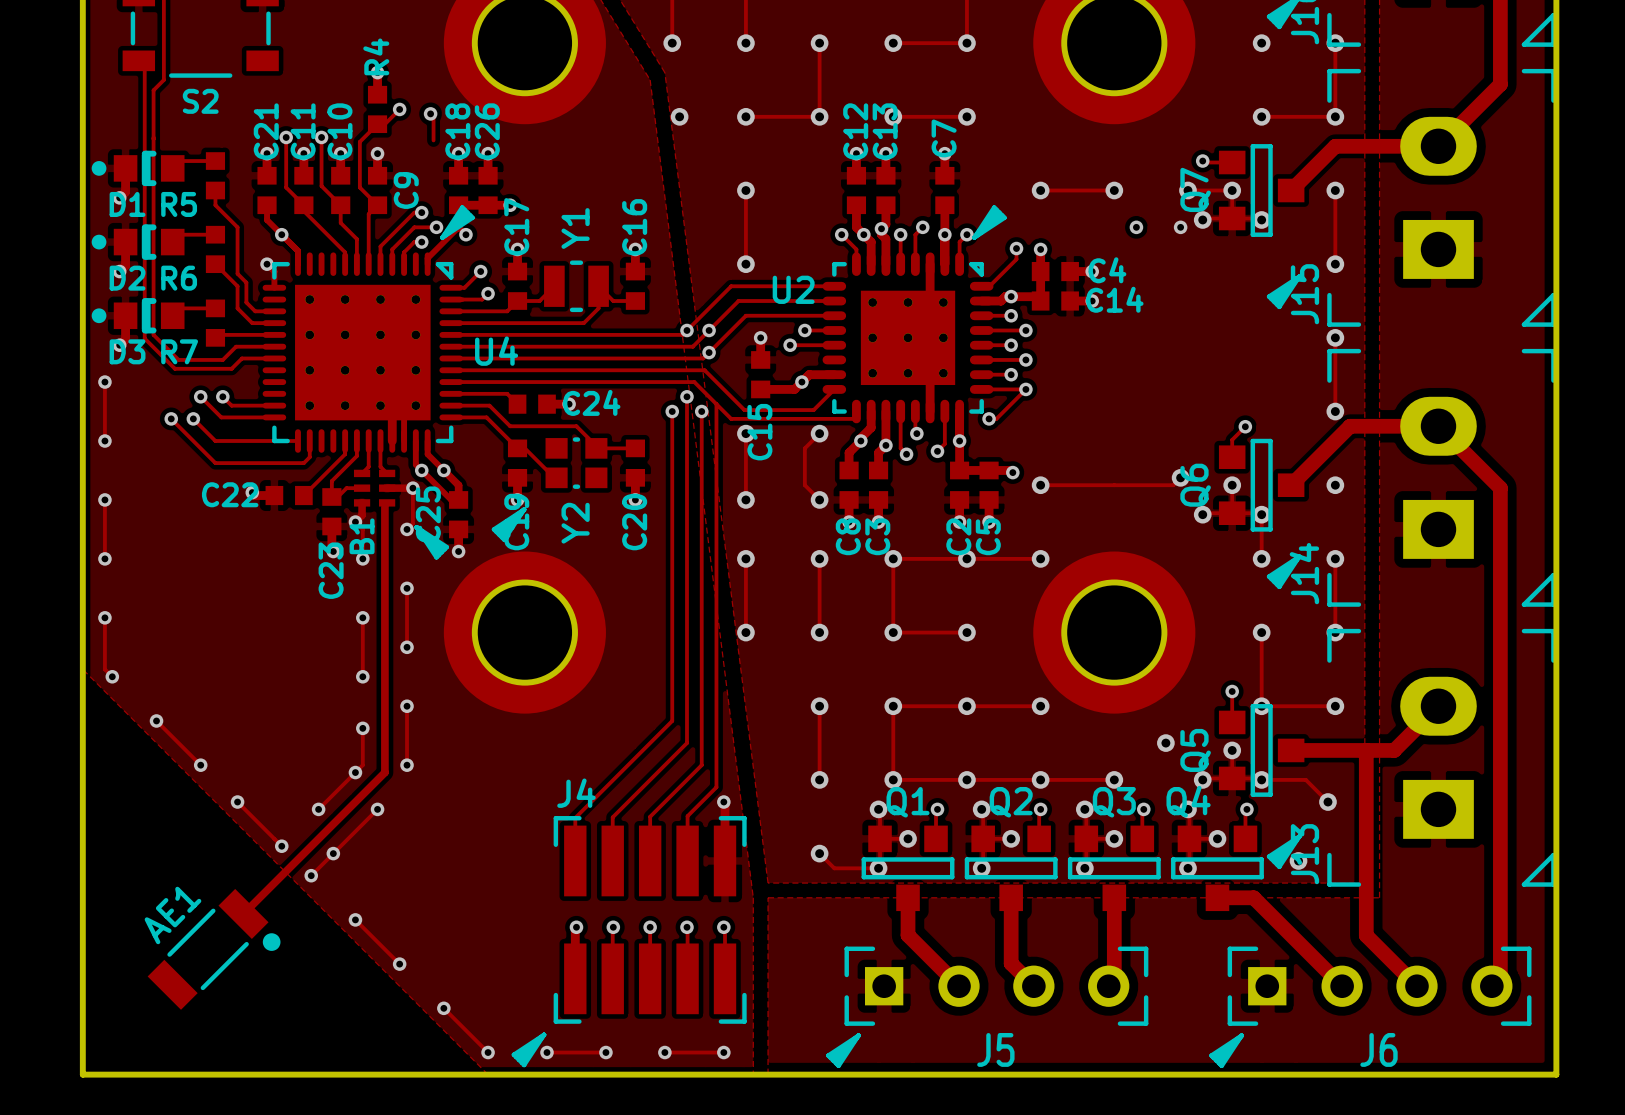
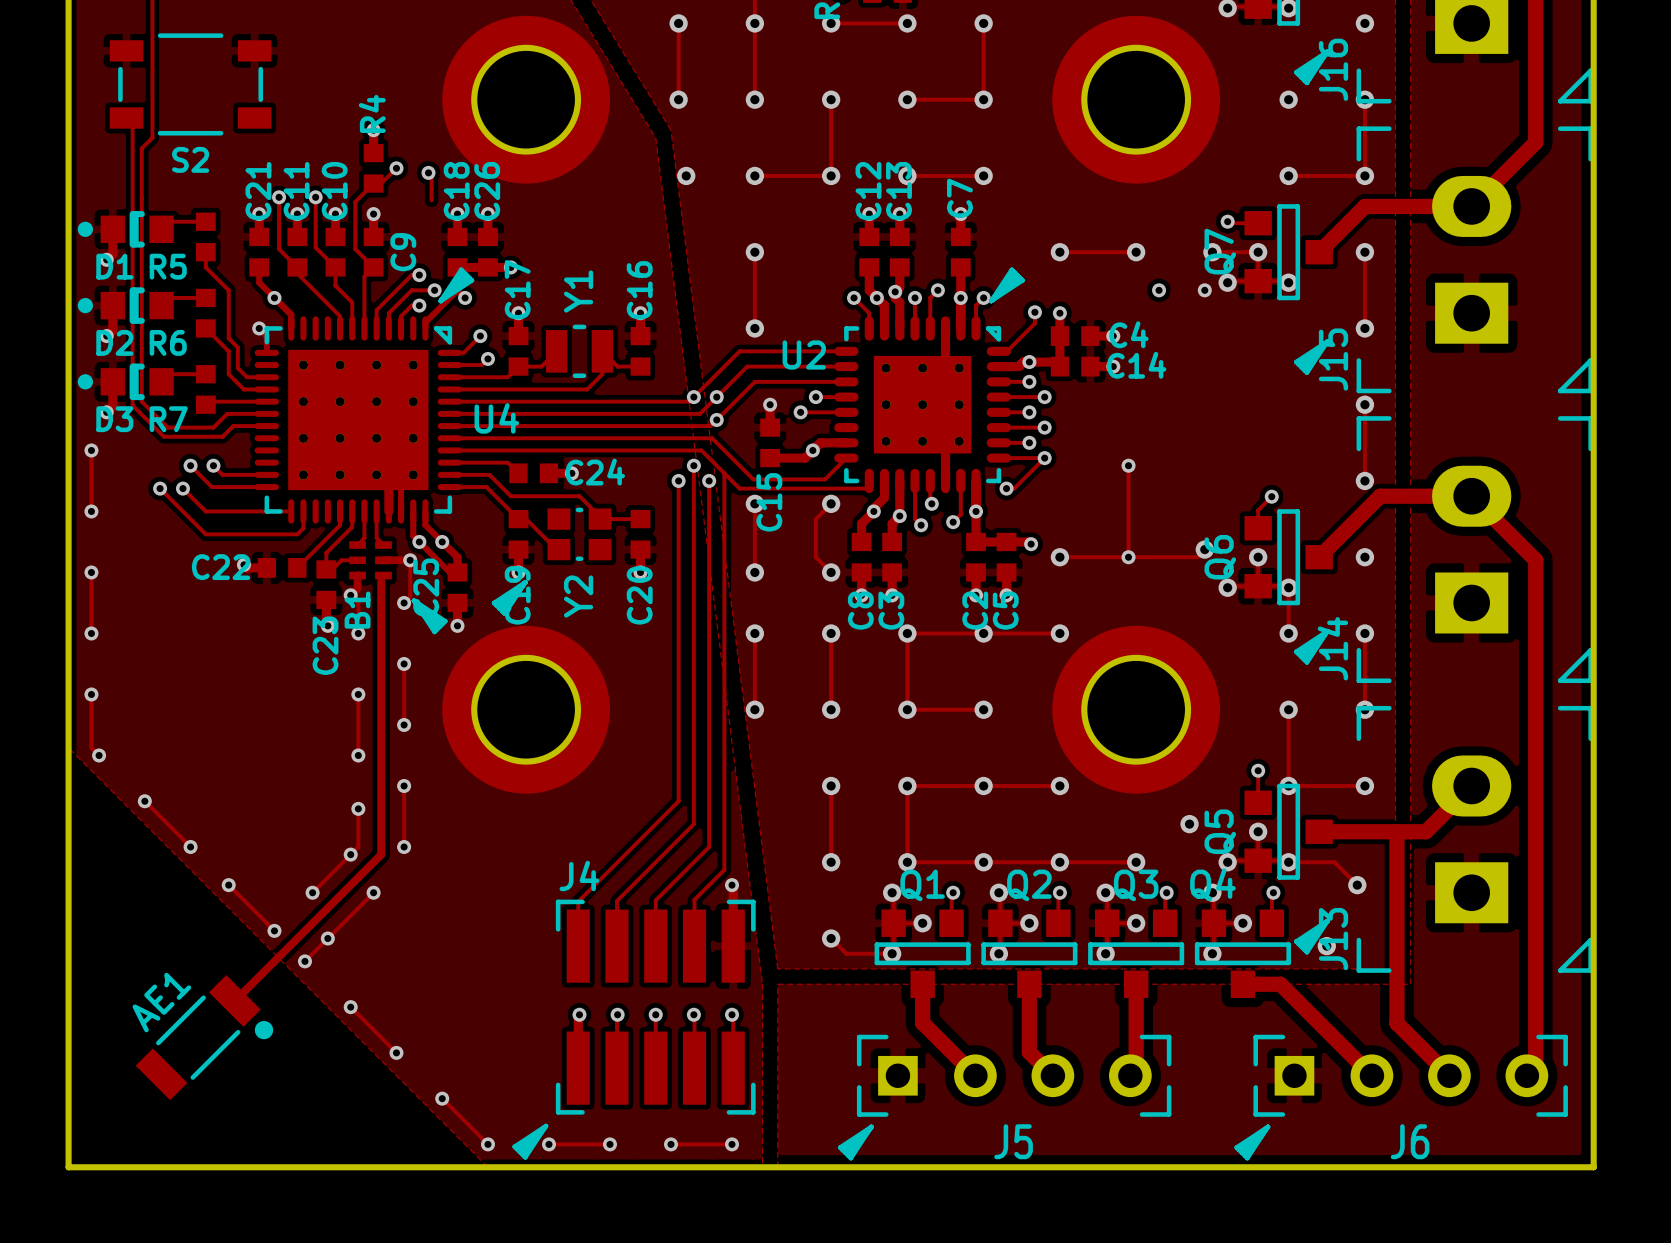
track: none -> (1128, 465) (1128, 557)
via: none -> (1128, 465)
via: none -> (1128, 557)

